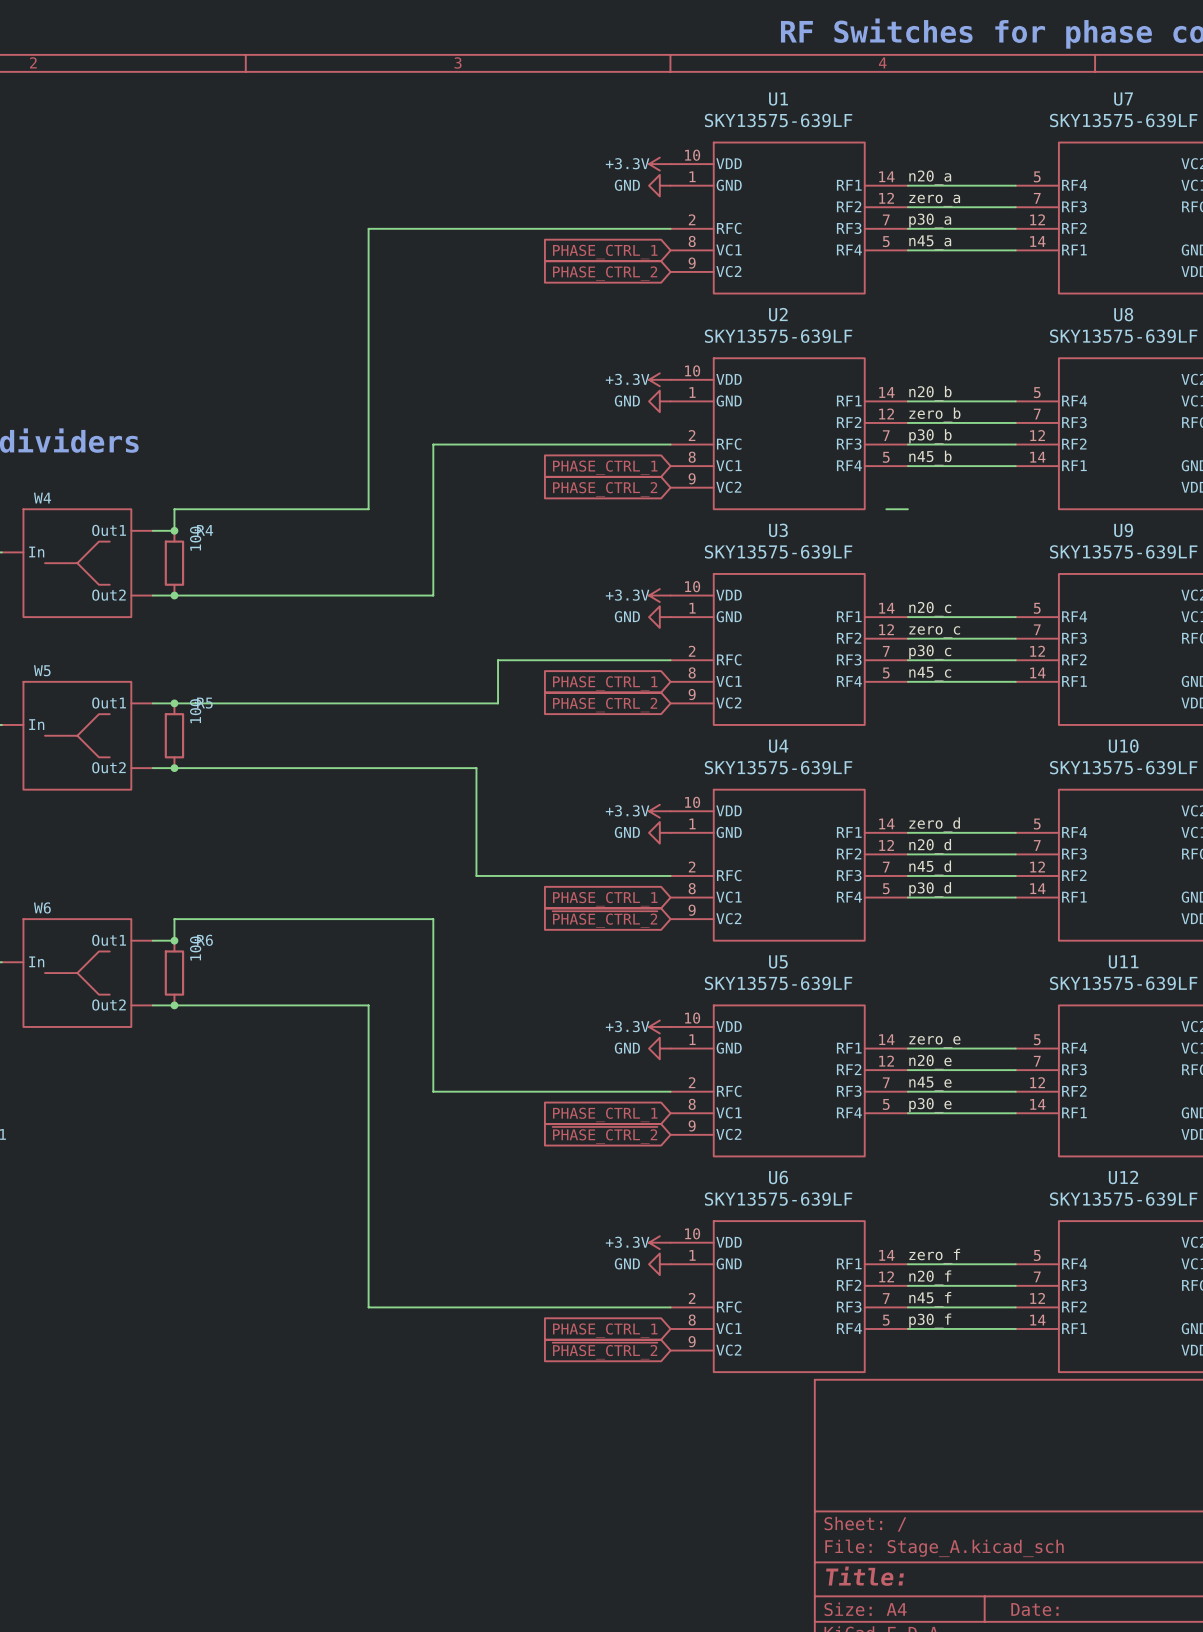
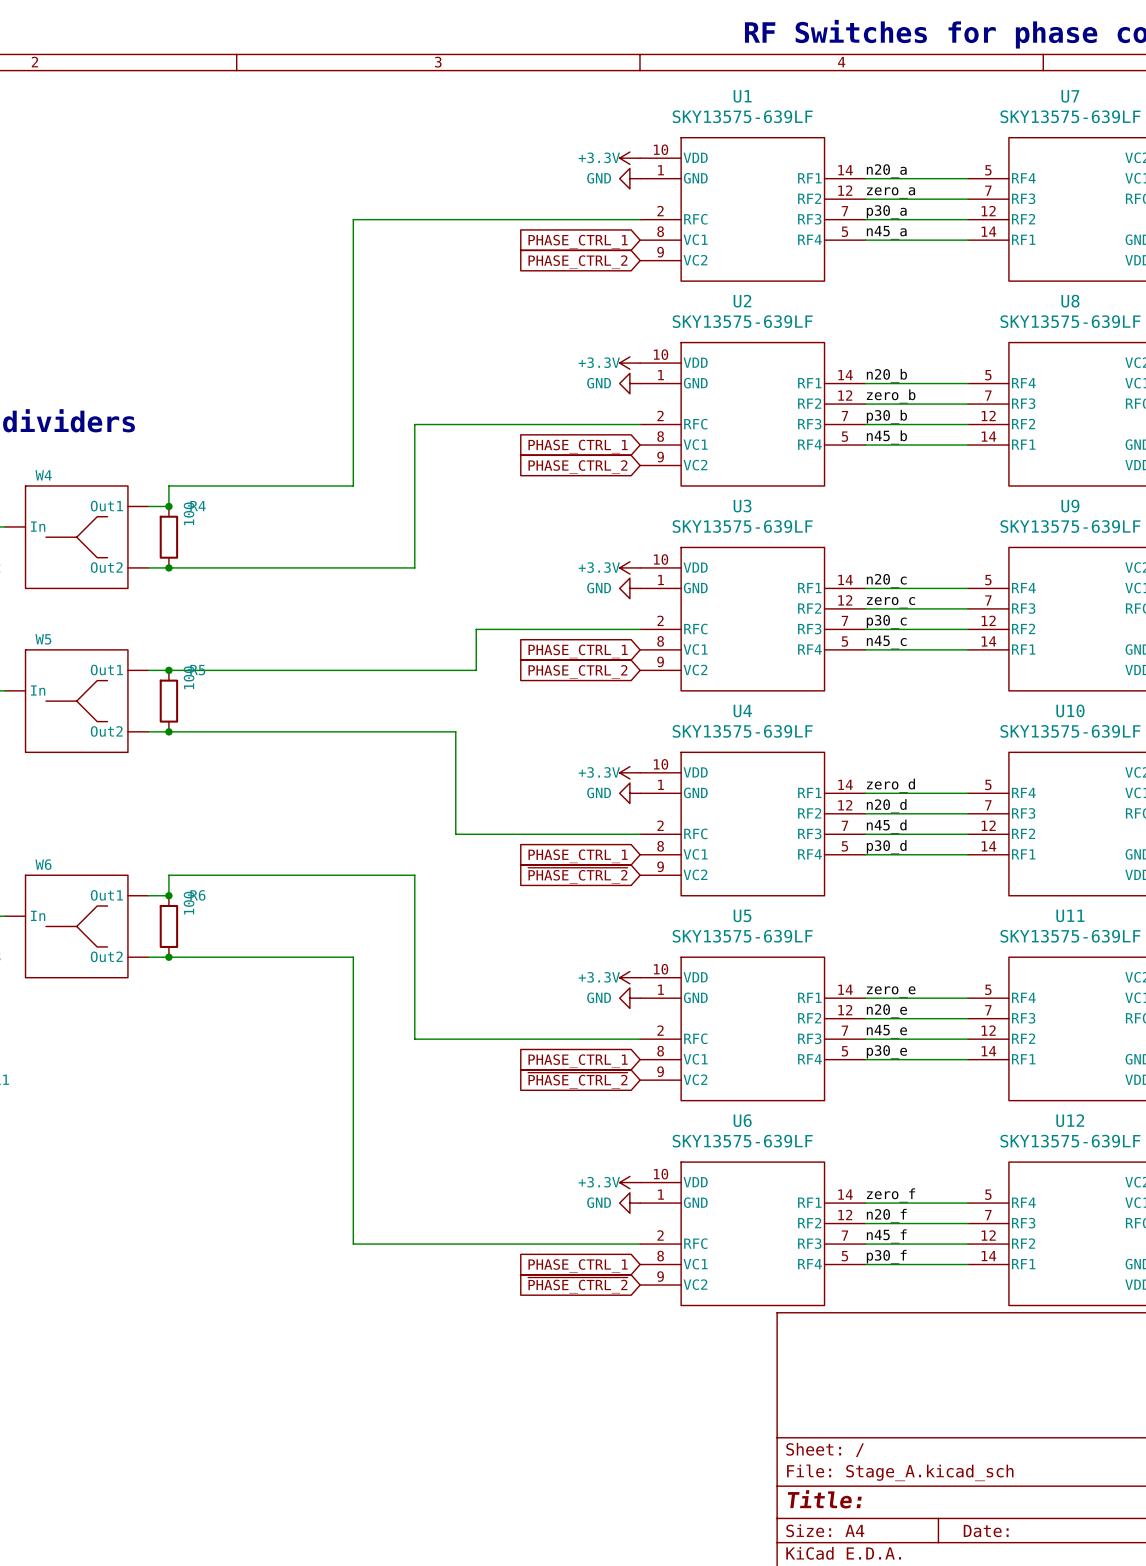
wire: (886, 509) (907, 509) -> none

